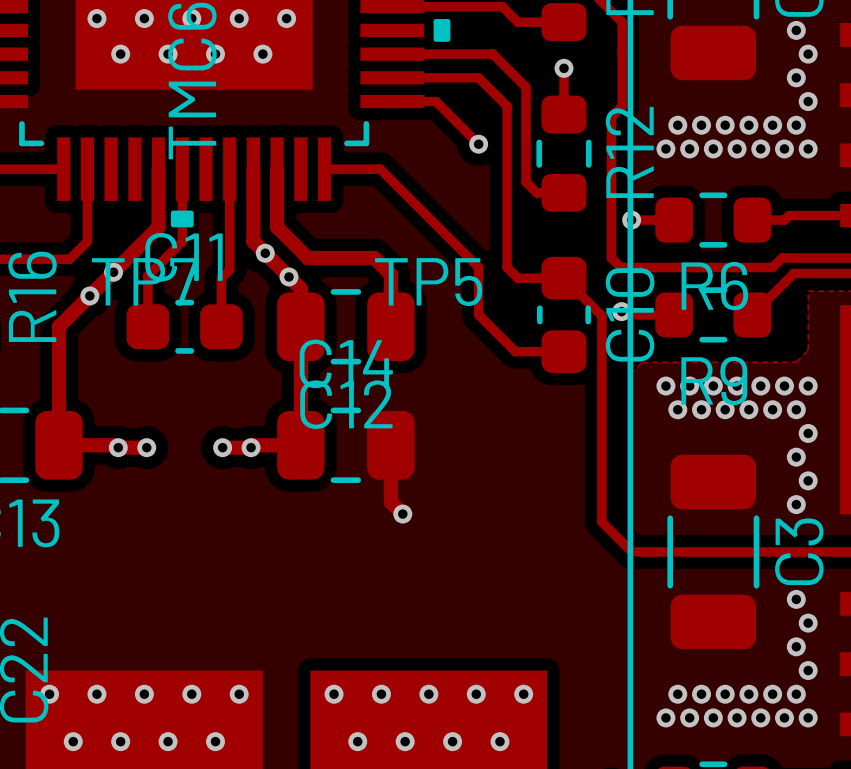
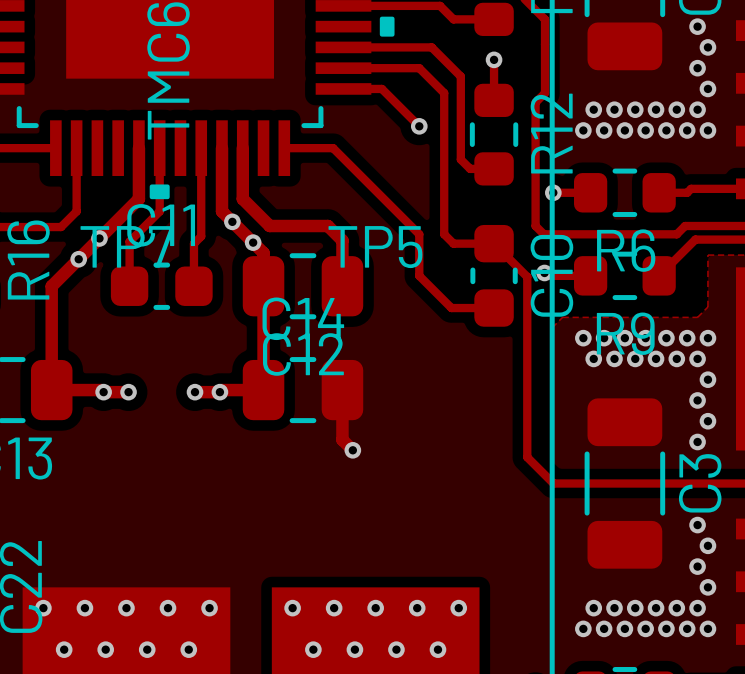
via: (96, 18) -> none
via: (144, 18) -> none
via: (191, 18) -> none
via: (239, 18) -> none
via: (286, 18) -> none
via: (120, 54) -> none
via: (168, 54) -> none
via: (215, 54) -> none
via: (262, 54) -> none

